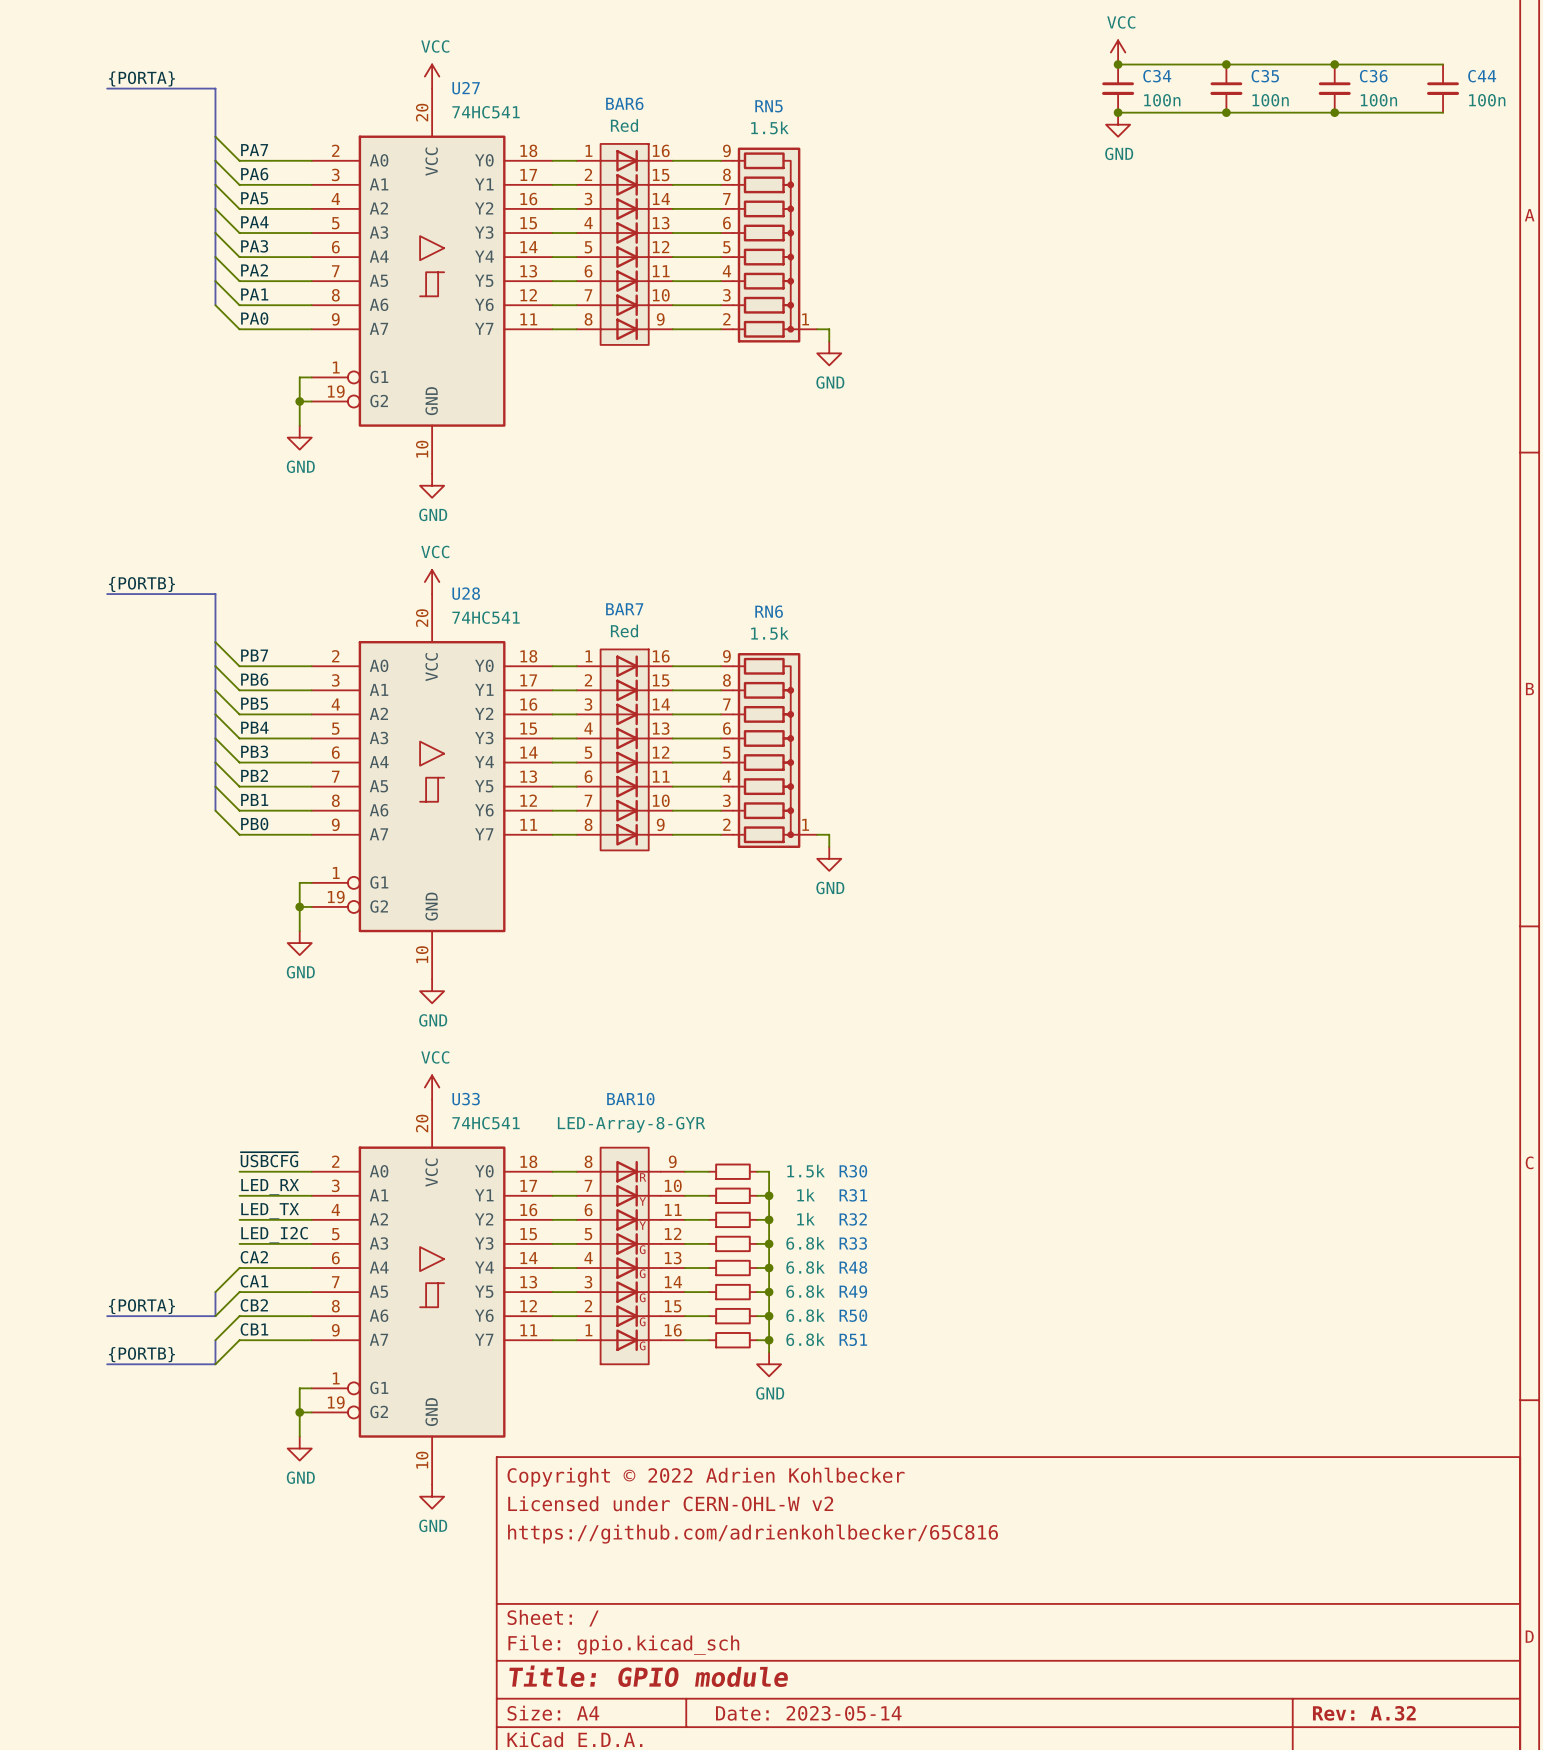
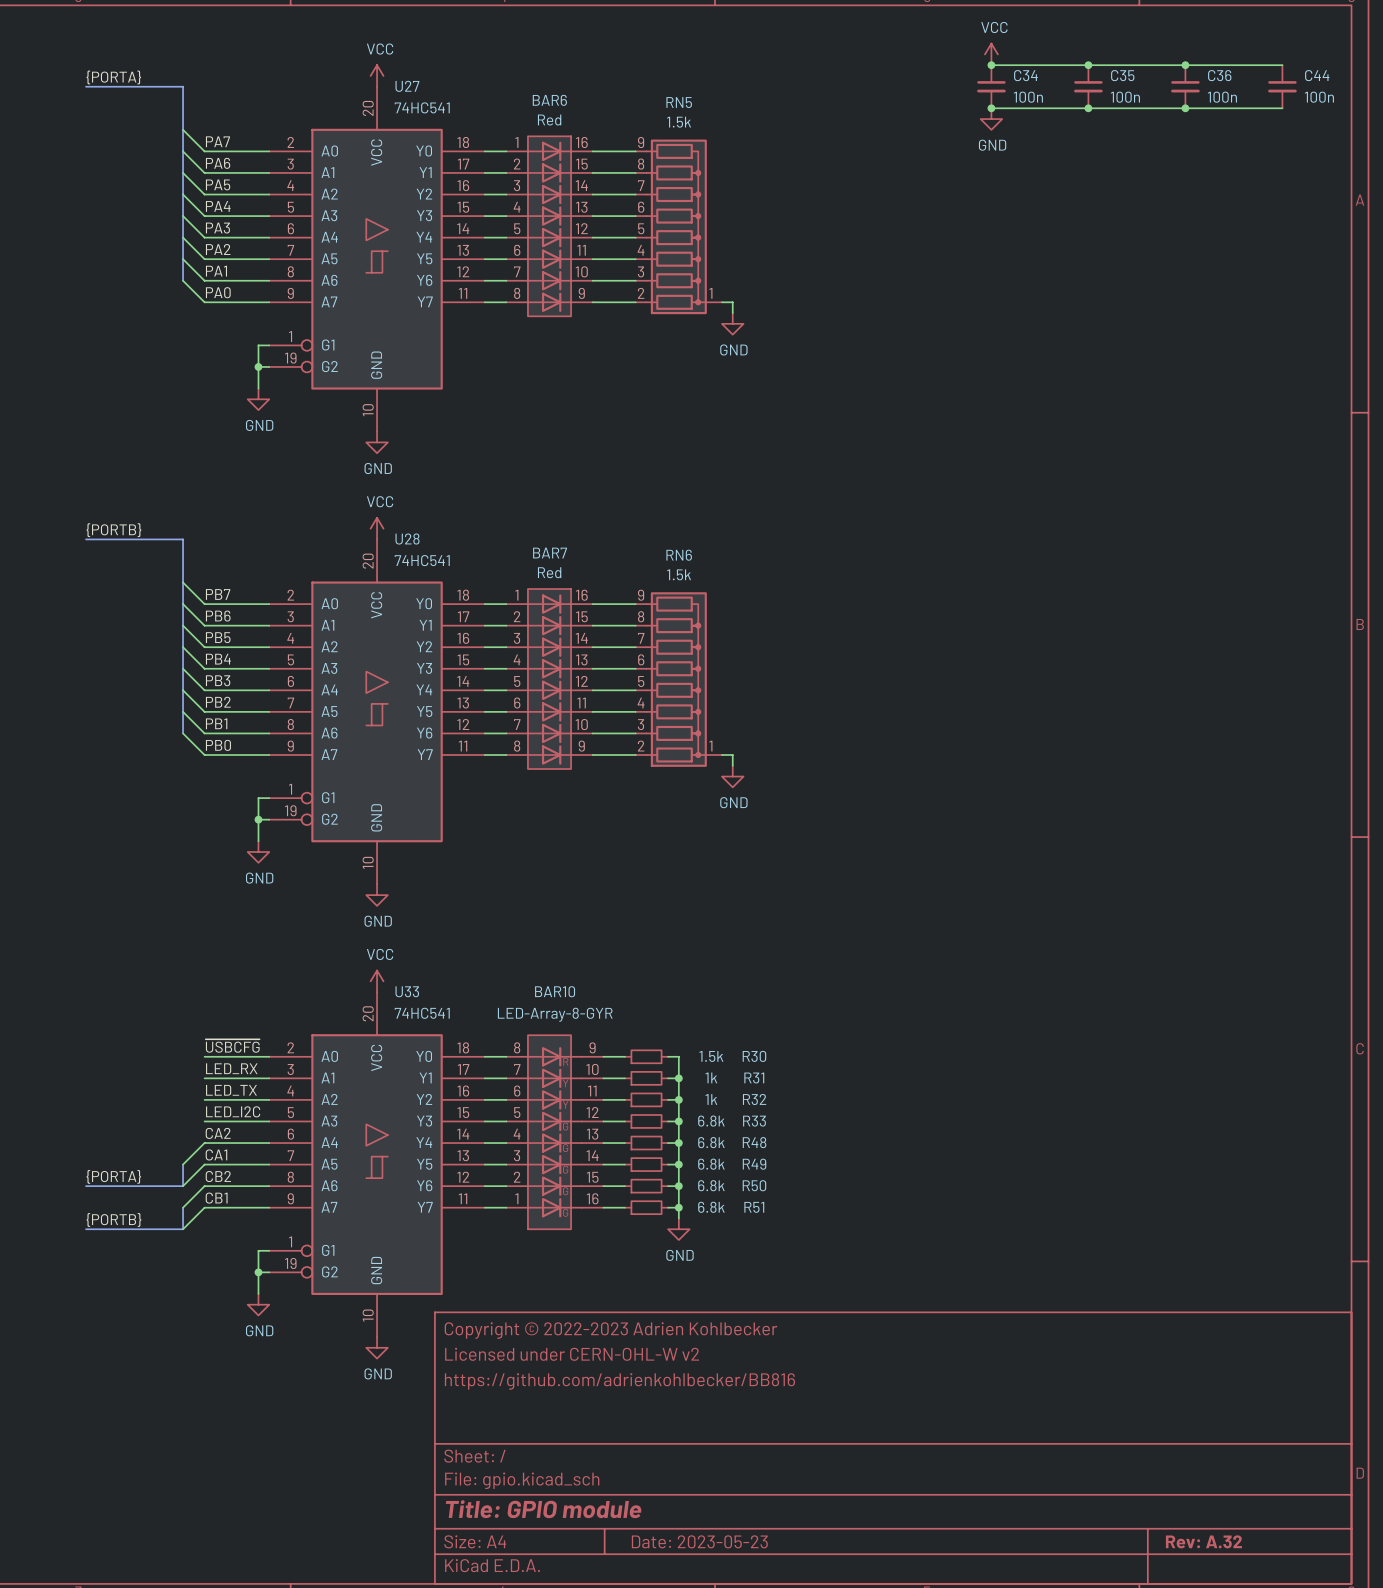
title block: Copyright © 2022 Adrien Kohlbecker (706, 1477) -> Copyright © 2022-2023 Adrien Kohlbecker (611, 1330)
title block: https://github.com/adrienkohlbecker/65C816 (753, 1534) -> https://github.com/adrienkohlbecker/BB816 (619, 1381)
title block: Date: 2023-05-14 (808, 1713) -> Date: 2023-05-23 (699, 1541)

